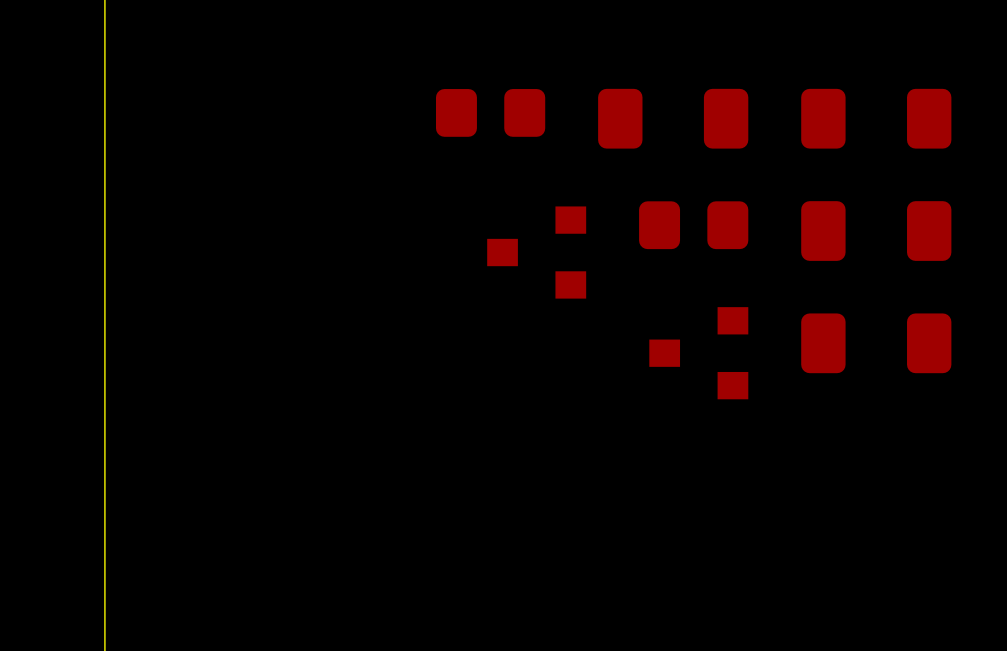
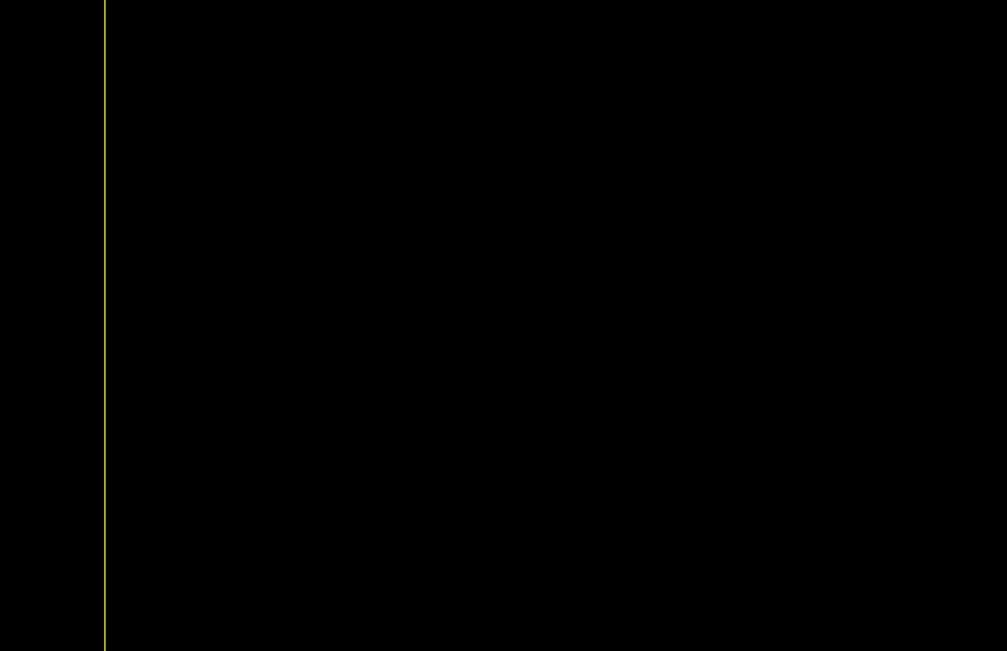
part: (490, 112) -> none
part: (673, 118) -> none
part: (876, 118) -> none
part: (693, 225) -> none
part: (876, 231) -> none
part: (536, 252) -> none
part: (876, 343) -> none
part: (698, 353) -> none

